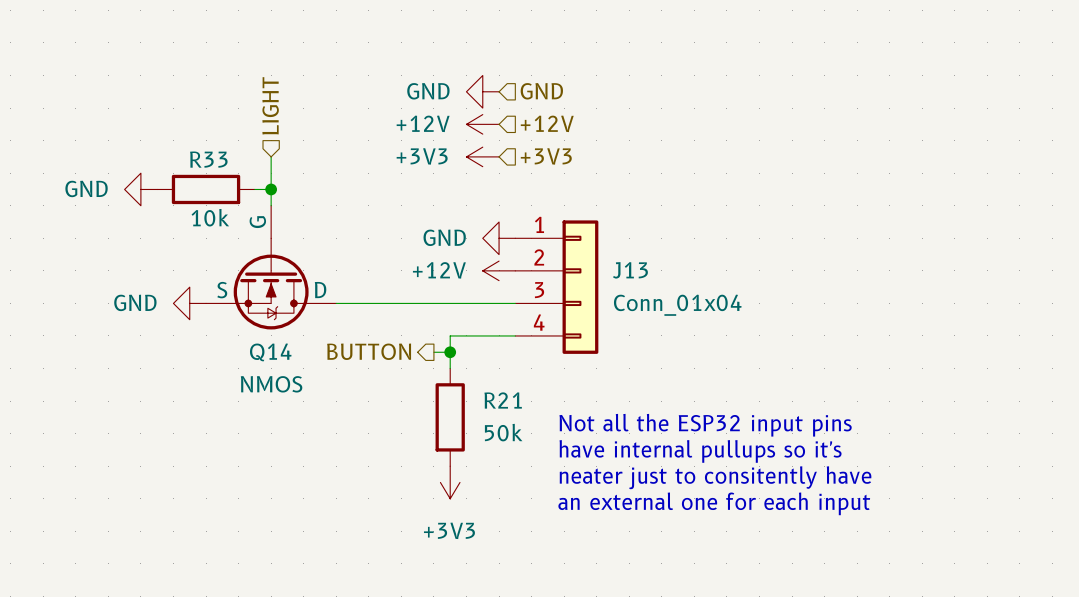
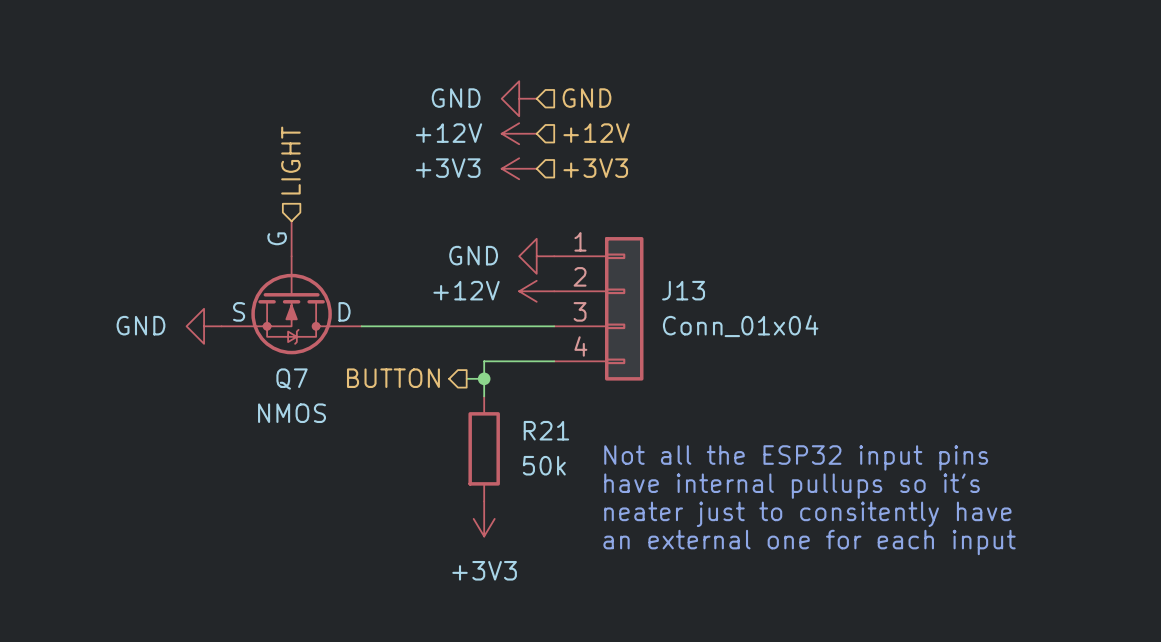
hierarchical label position: LIGHT (270, 105) -> LIGHT (290, 160)
wire: (271, 156) (271, 205) -> none
power symbol: GND (140, 189) -> none
R33: 10k (206, 189) -> none
wire: (254, 189) (271, 189) -> none
junction: (271, 189) -> none
Q14 name: Q14 (270, 352) -> Q7 (292, 379)

